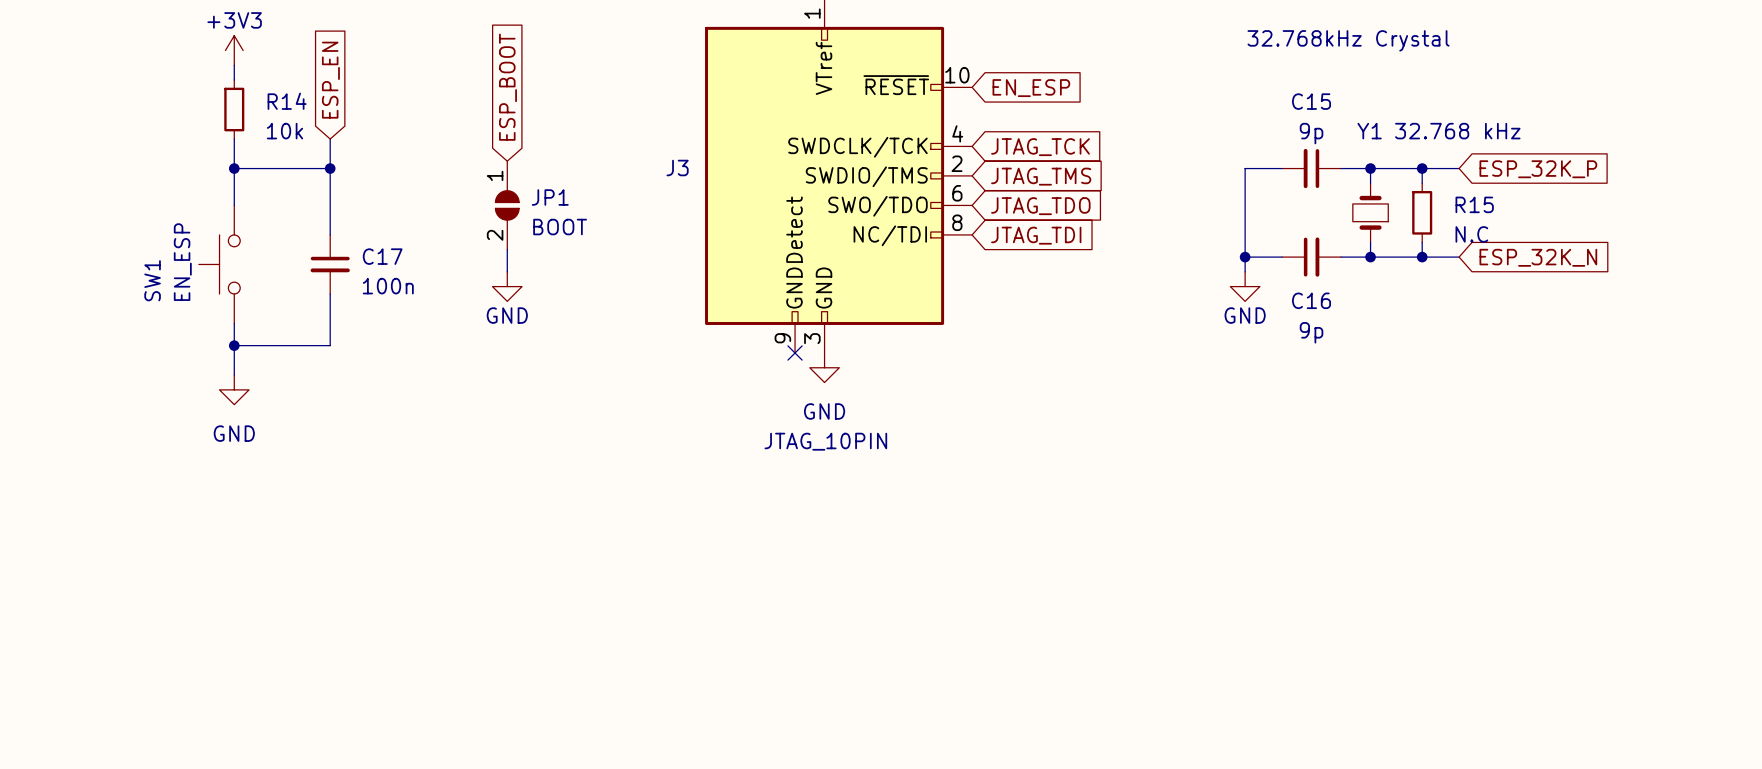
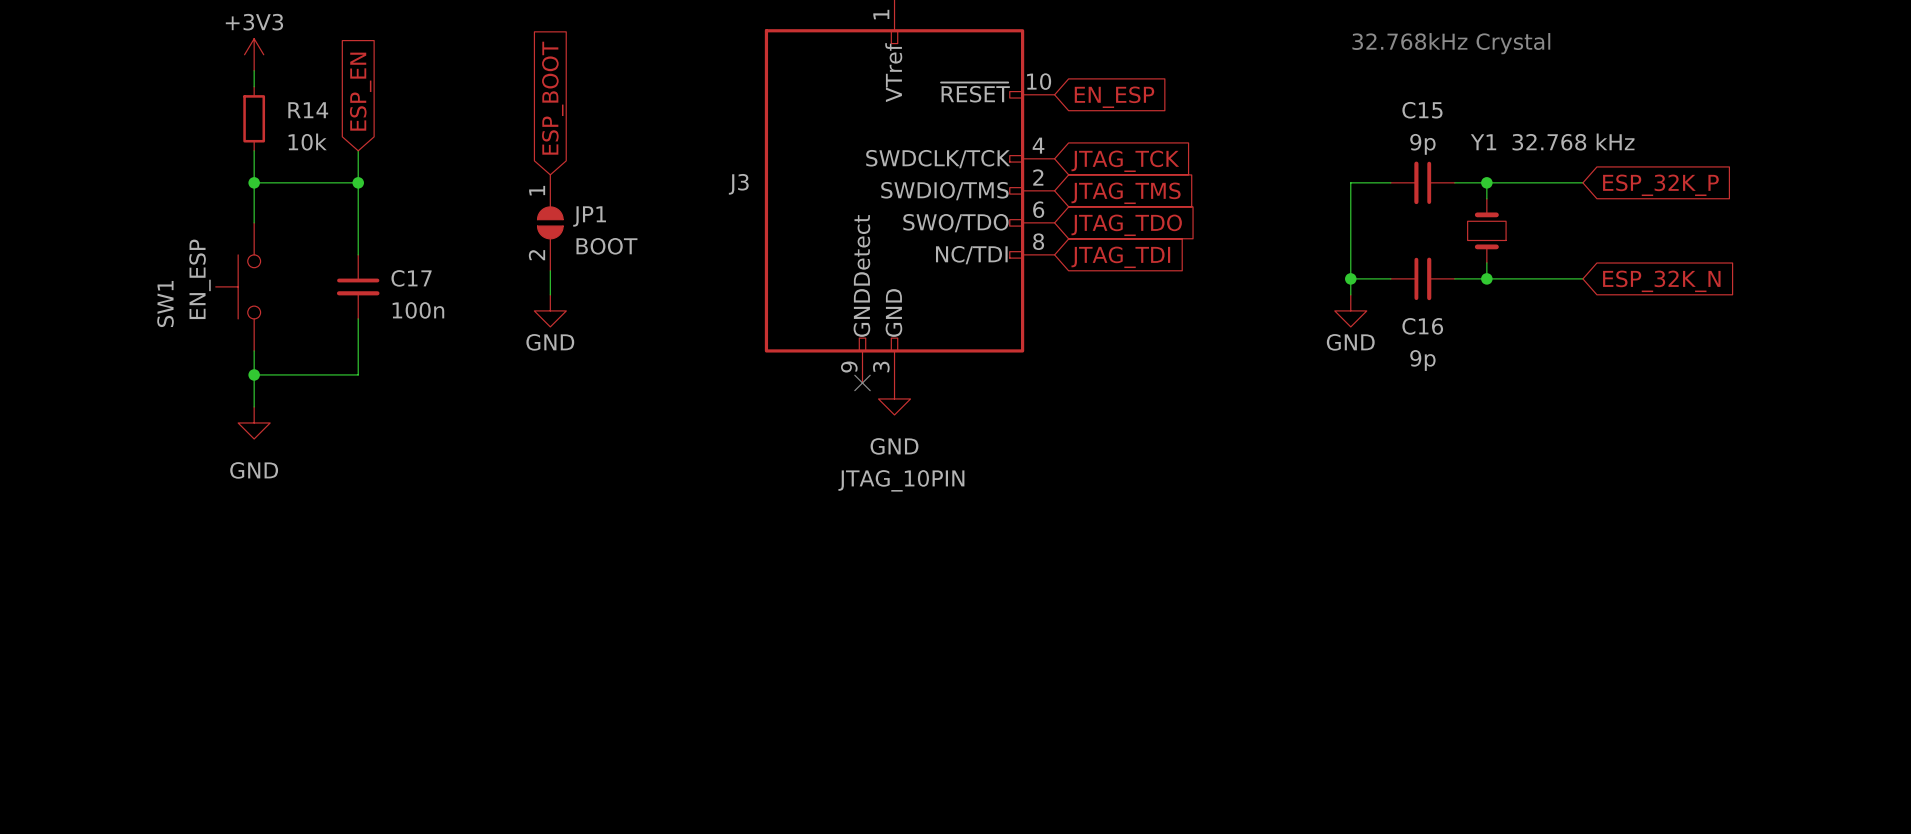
wire: (1422, 168) (1422, 183) -> none
junction: (1422, 168) -> none
R15: N.C (1422, 212) -> none
wire: (1422, 242) (1422, 257) -> none
junction: (1422, 257) -> none

